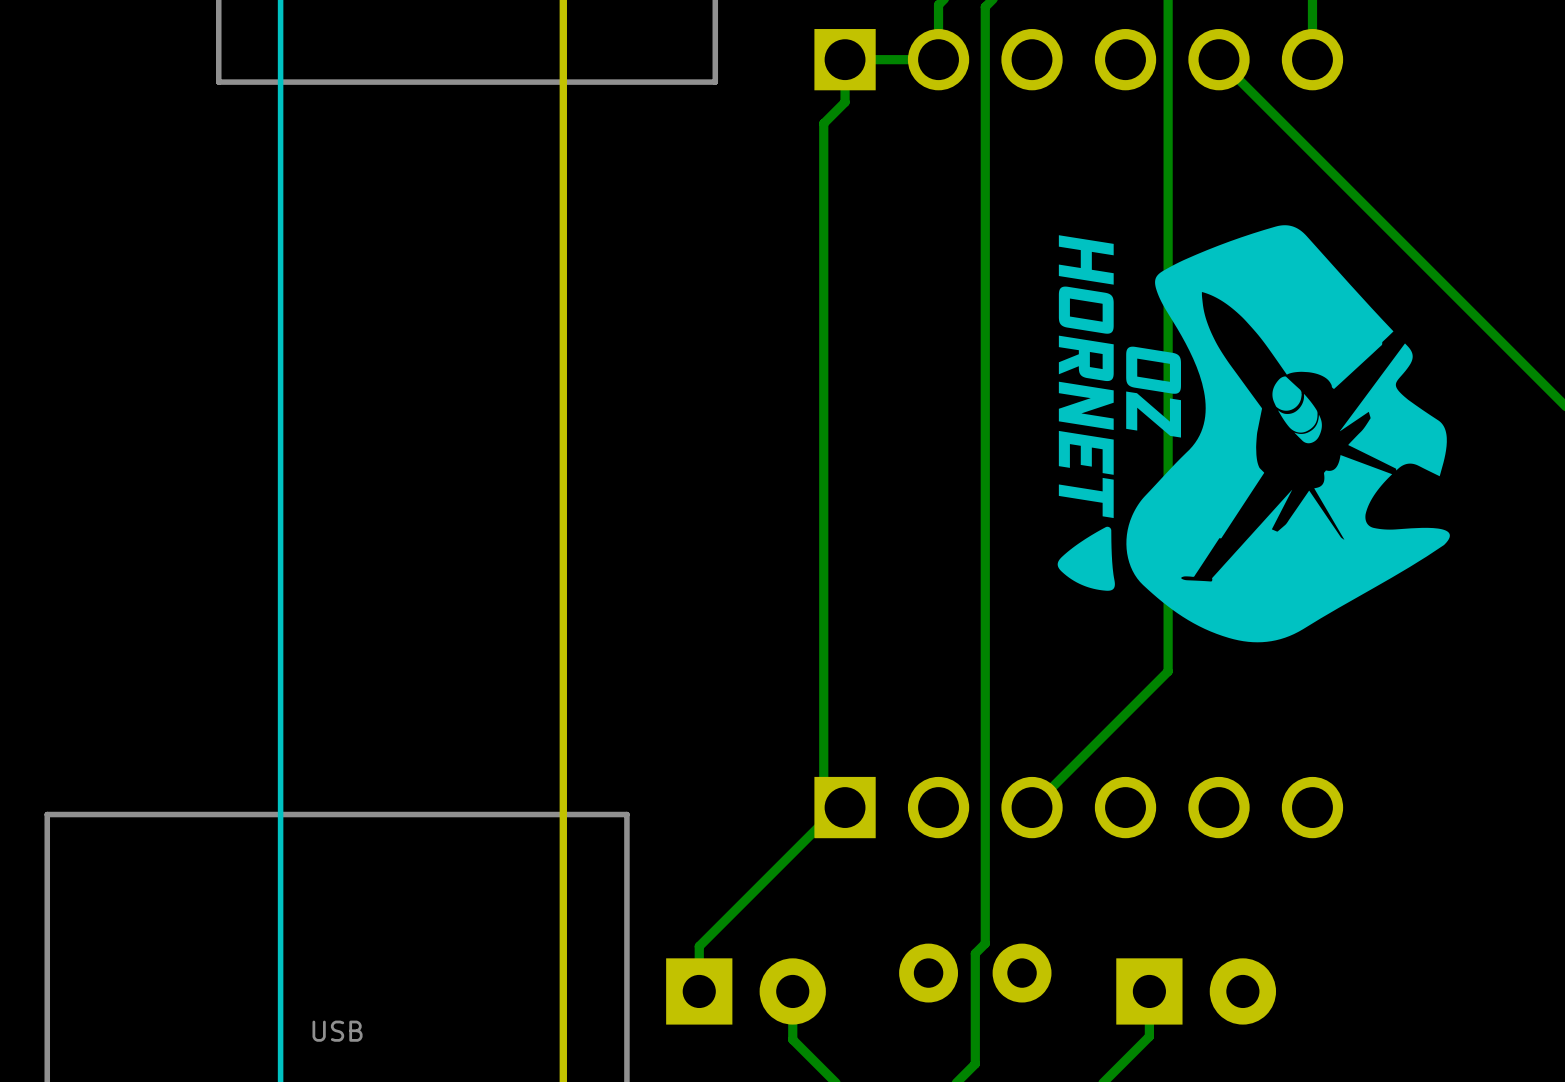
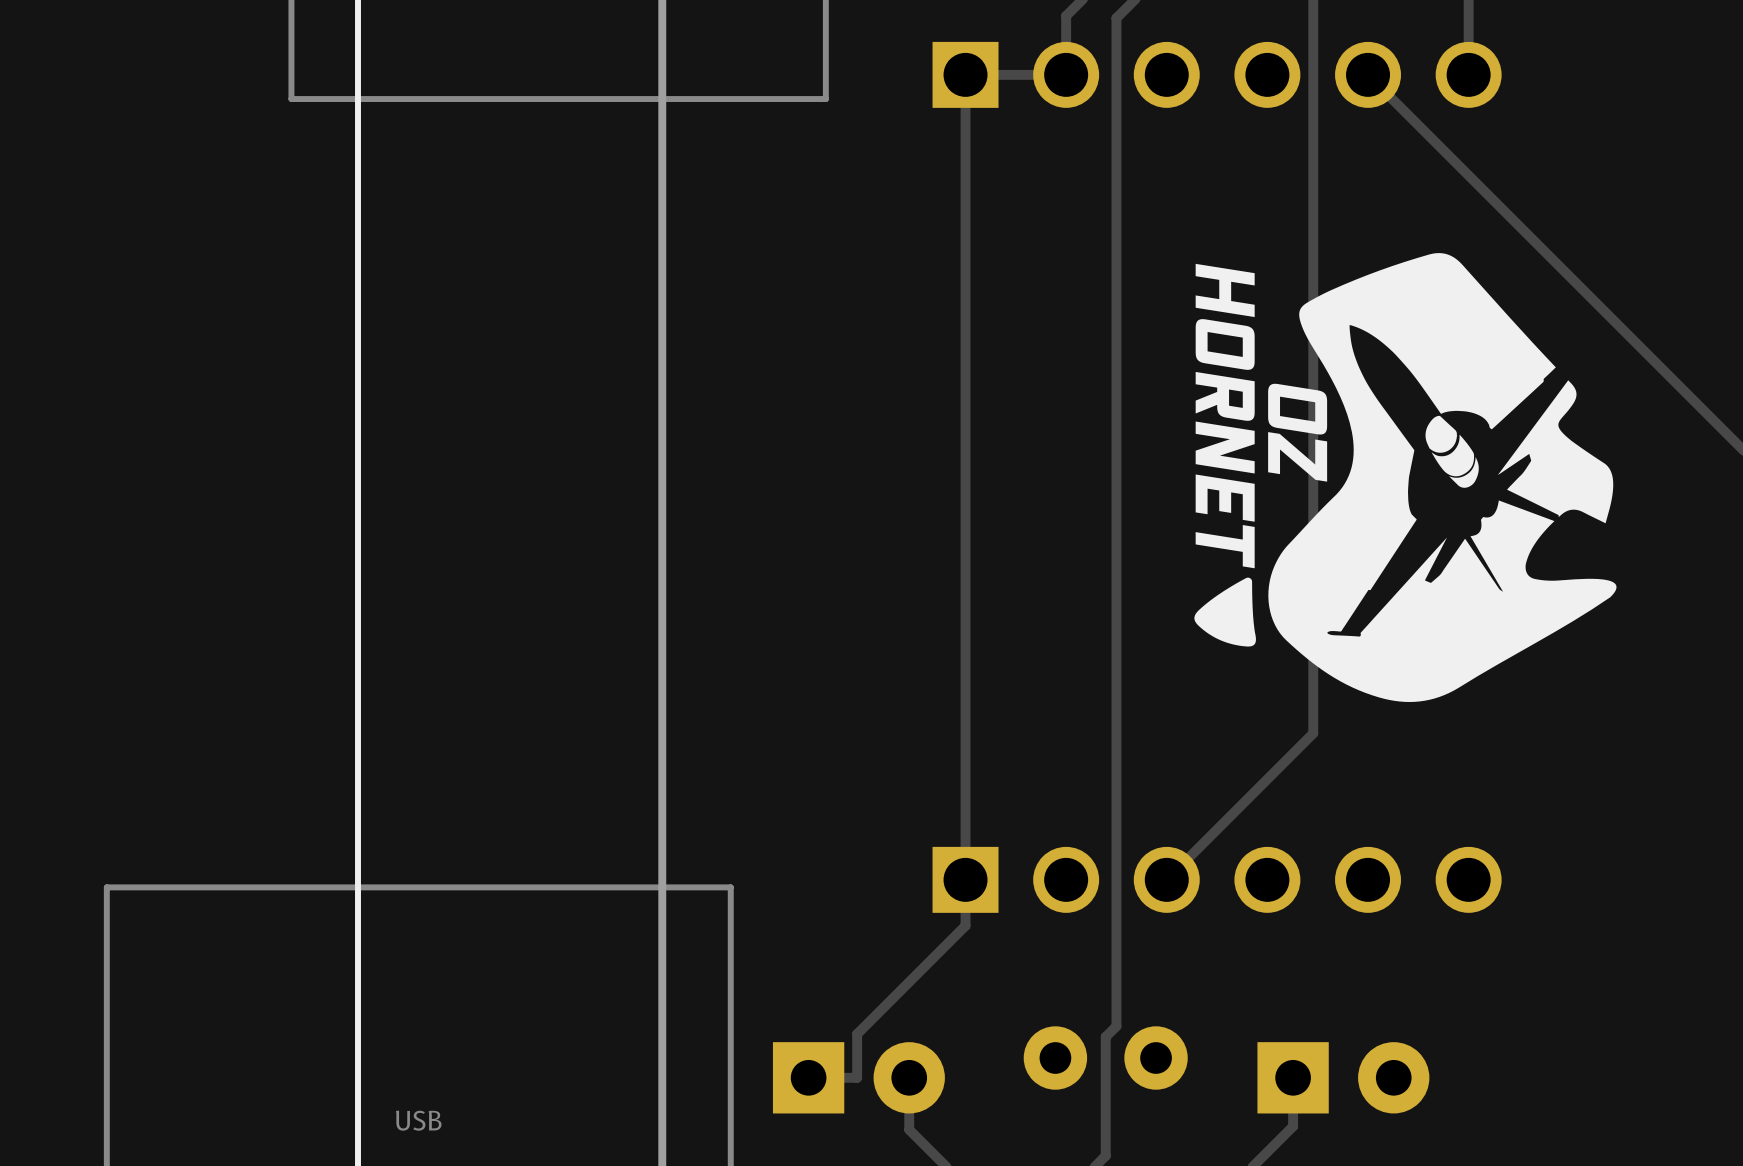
track: (845, 102) (823, 123) (823, 821) (699, 946) (699, 991) -> (965, 120) (965, 925) (857, 1034) (857, 1077) (808, 1077)

